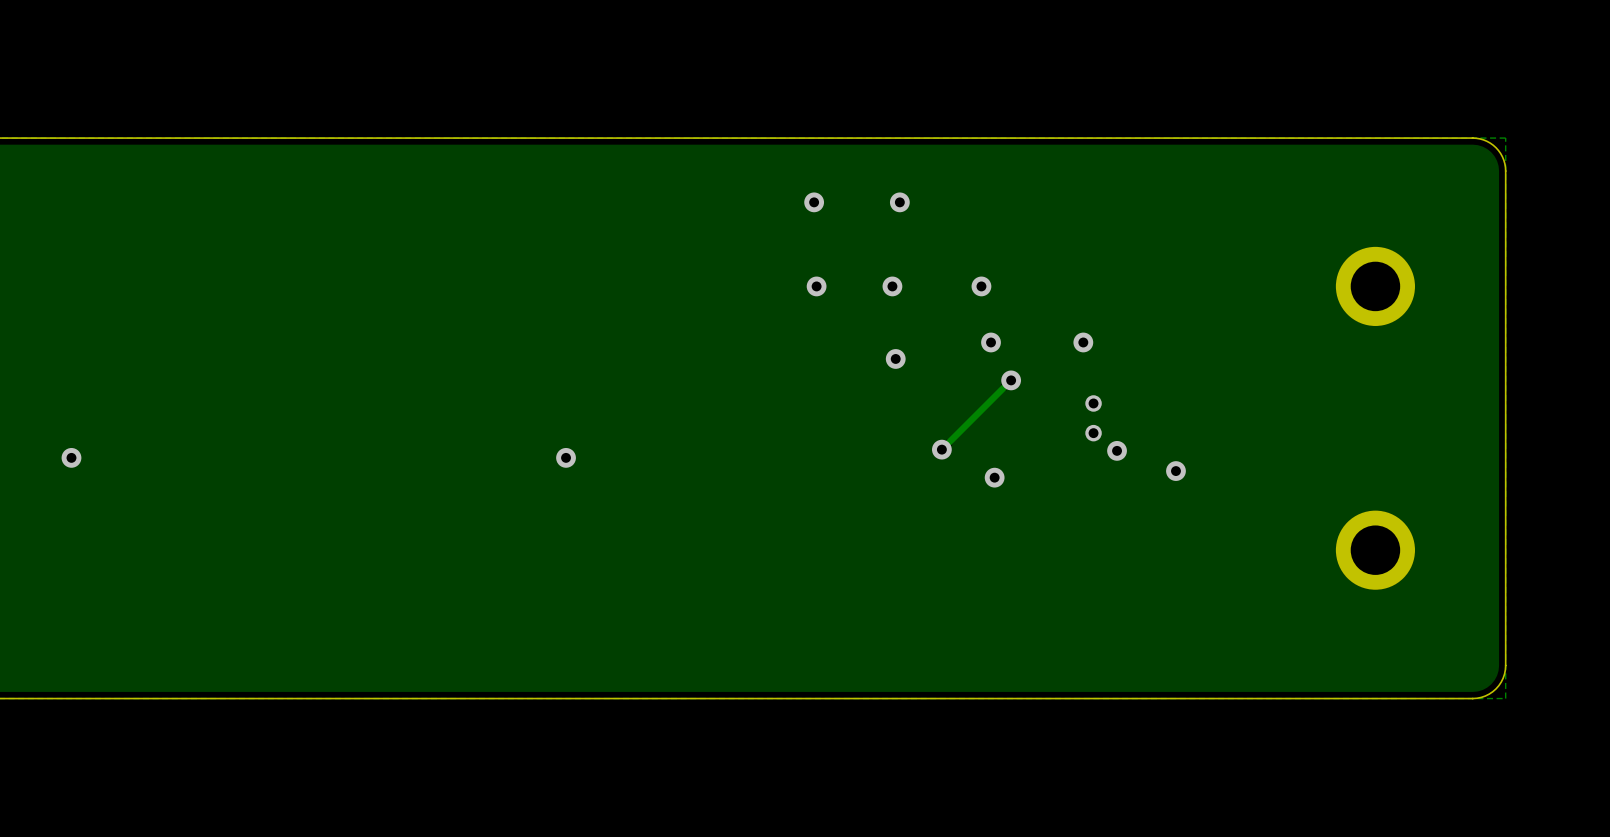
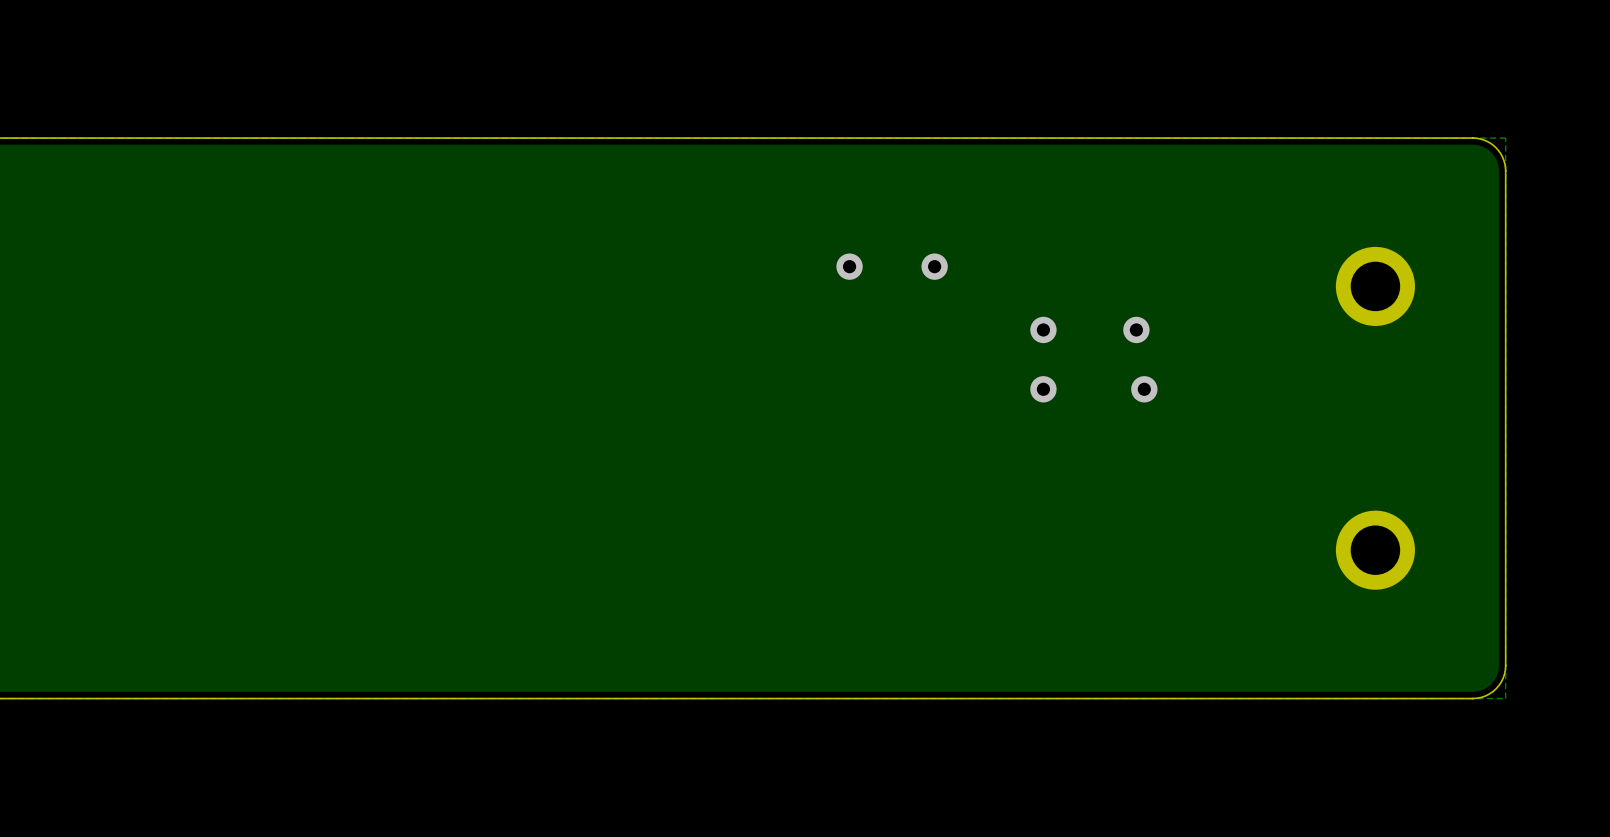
via: (814, 202) -> none
via: (899, 202) -> none
via: none -> (849, 266)
via: none -> (934, 266)
via: (816, 286) -> none
via: (892, 286) -> none
via: (981, 286) -> none
via: none -> (1043, 329)
via: none -> (1136, 329)
via: (991, 342) -> none
via: (1083, 342) -> none
via: (895, 358) -> none
track: (1011, 380) (941, 449) -> none
via: (1011, 380) -> none
via: none -> (1043, 389)
via: none -> (1144, 389)
via: (1093, 403) -> none
via: (1093, 433) -> none
via: (941, 449) -> none
via: (1117, 450) -> none
via: (71, 457) -> none
via: (566, 457) -> none
via: (1175, 471) -> none
via: (994, 477) -> none

